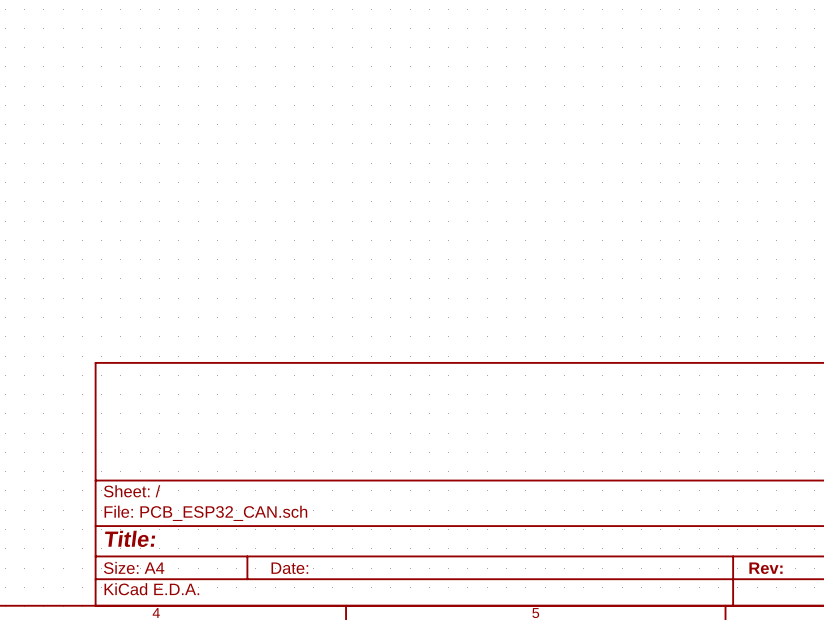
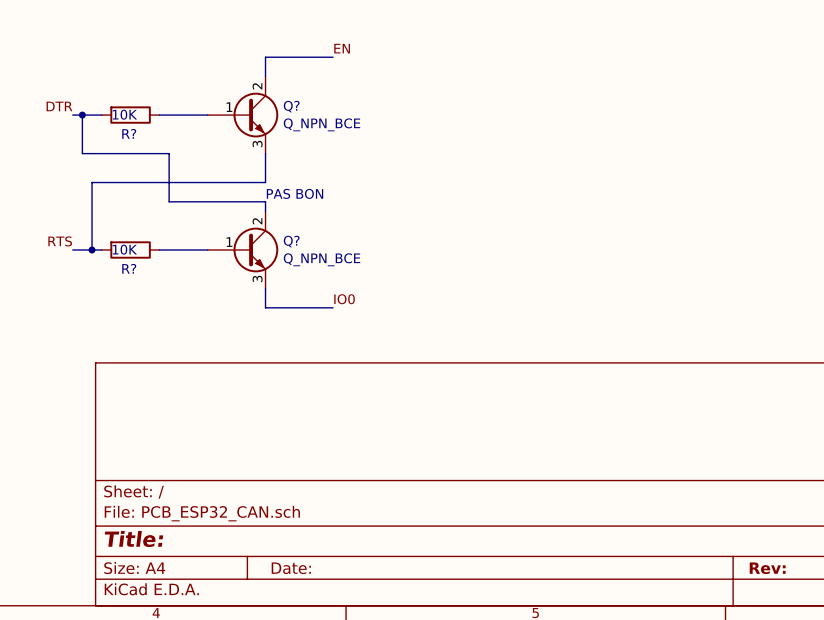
label: none -> EN (342, 48)
wire: none -> (332, 57) (265, 57) (265, 76)
label: none -> DTR (59, 106)
wire: none -> (72, 115) (101, 115)
wire: none -> (82, 115) (82, 153) (169, 153) (169, 201) (265, 201) (265, 211)
junction: none -> (82, 115)
R?: none -> 10K (130, 115)
wire: none -> (159, 115) (207, 115)
Q?: none -> Q_NPN_BCE (242, 115)
wire: none -> (265, 153) (265, 182) (92, 182) (92, 250)
text: none -> PAS BON (295, 193)
label: none -> RTS (60, 241)
wire: none -> (72, 250) (101, 250)
junction: none -> (92, 250)
R?: none -> 10K (130, 250)
wire: none -> (159, 250) (207, 250)
Q?: none -> Q_NPN_BCE (242, 250)
wire: none -> (265, 288) (265, 307) (332, 307)
label: none -> IO0 (344, 299)

